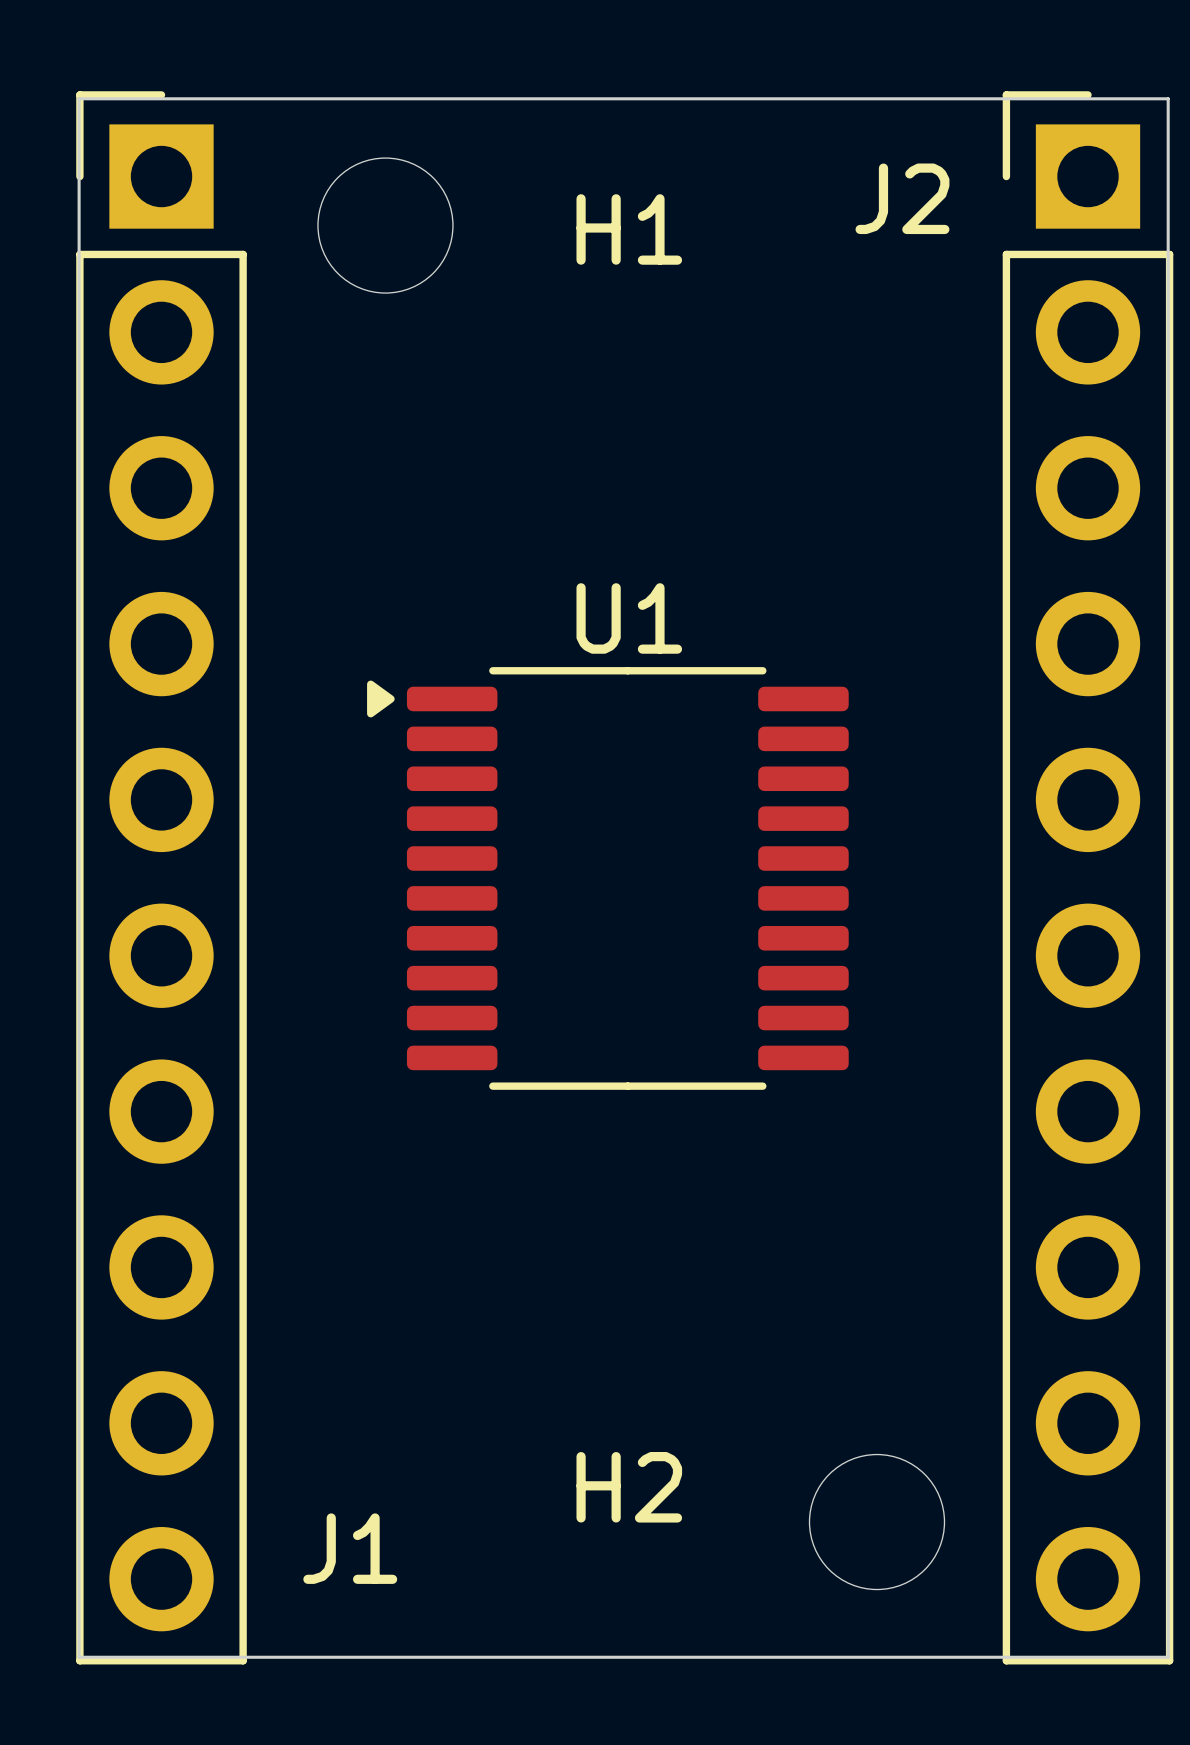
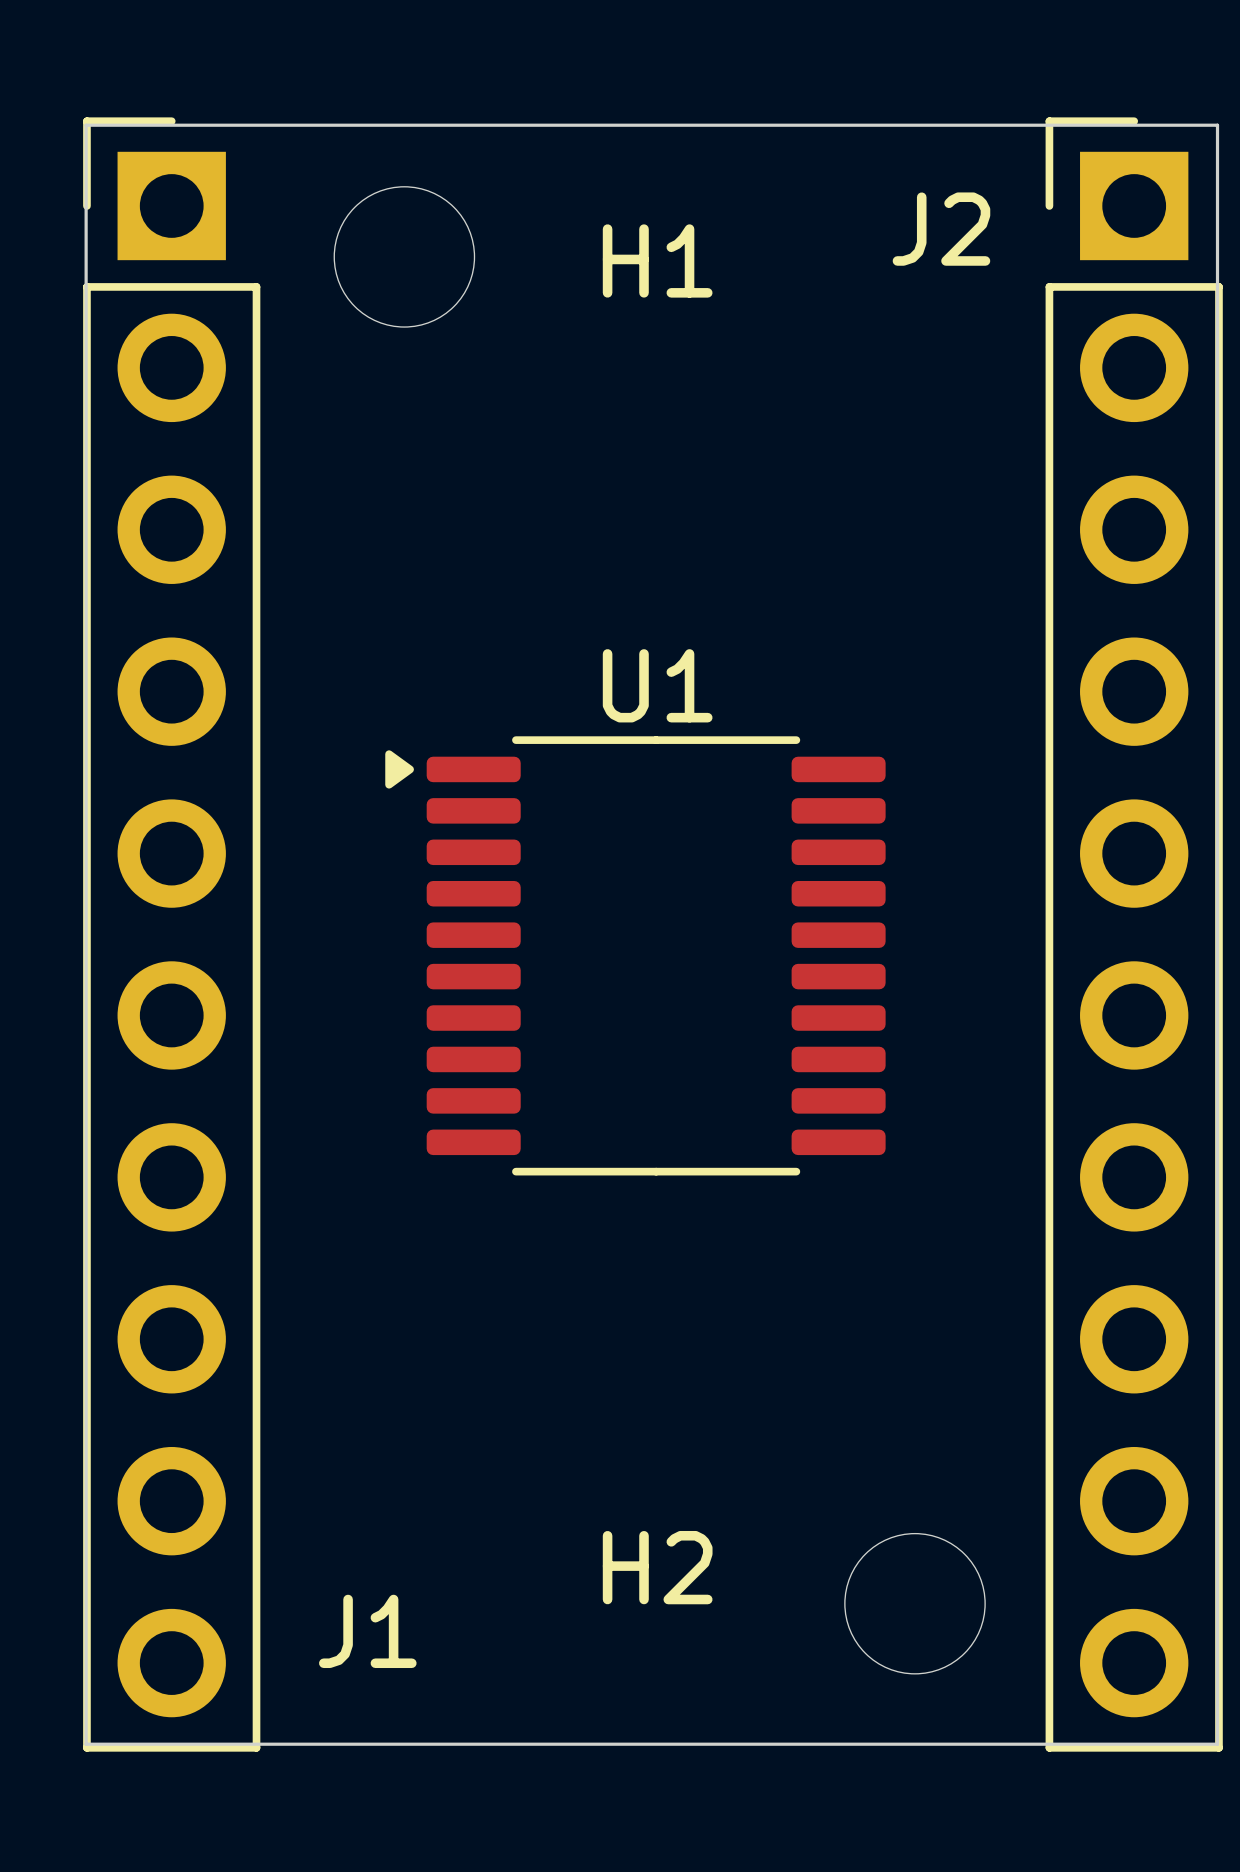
U1 position: (607, 878) -> (635, 955)

